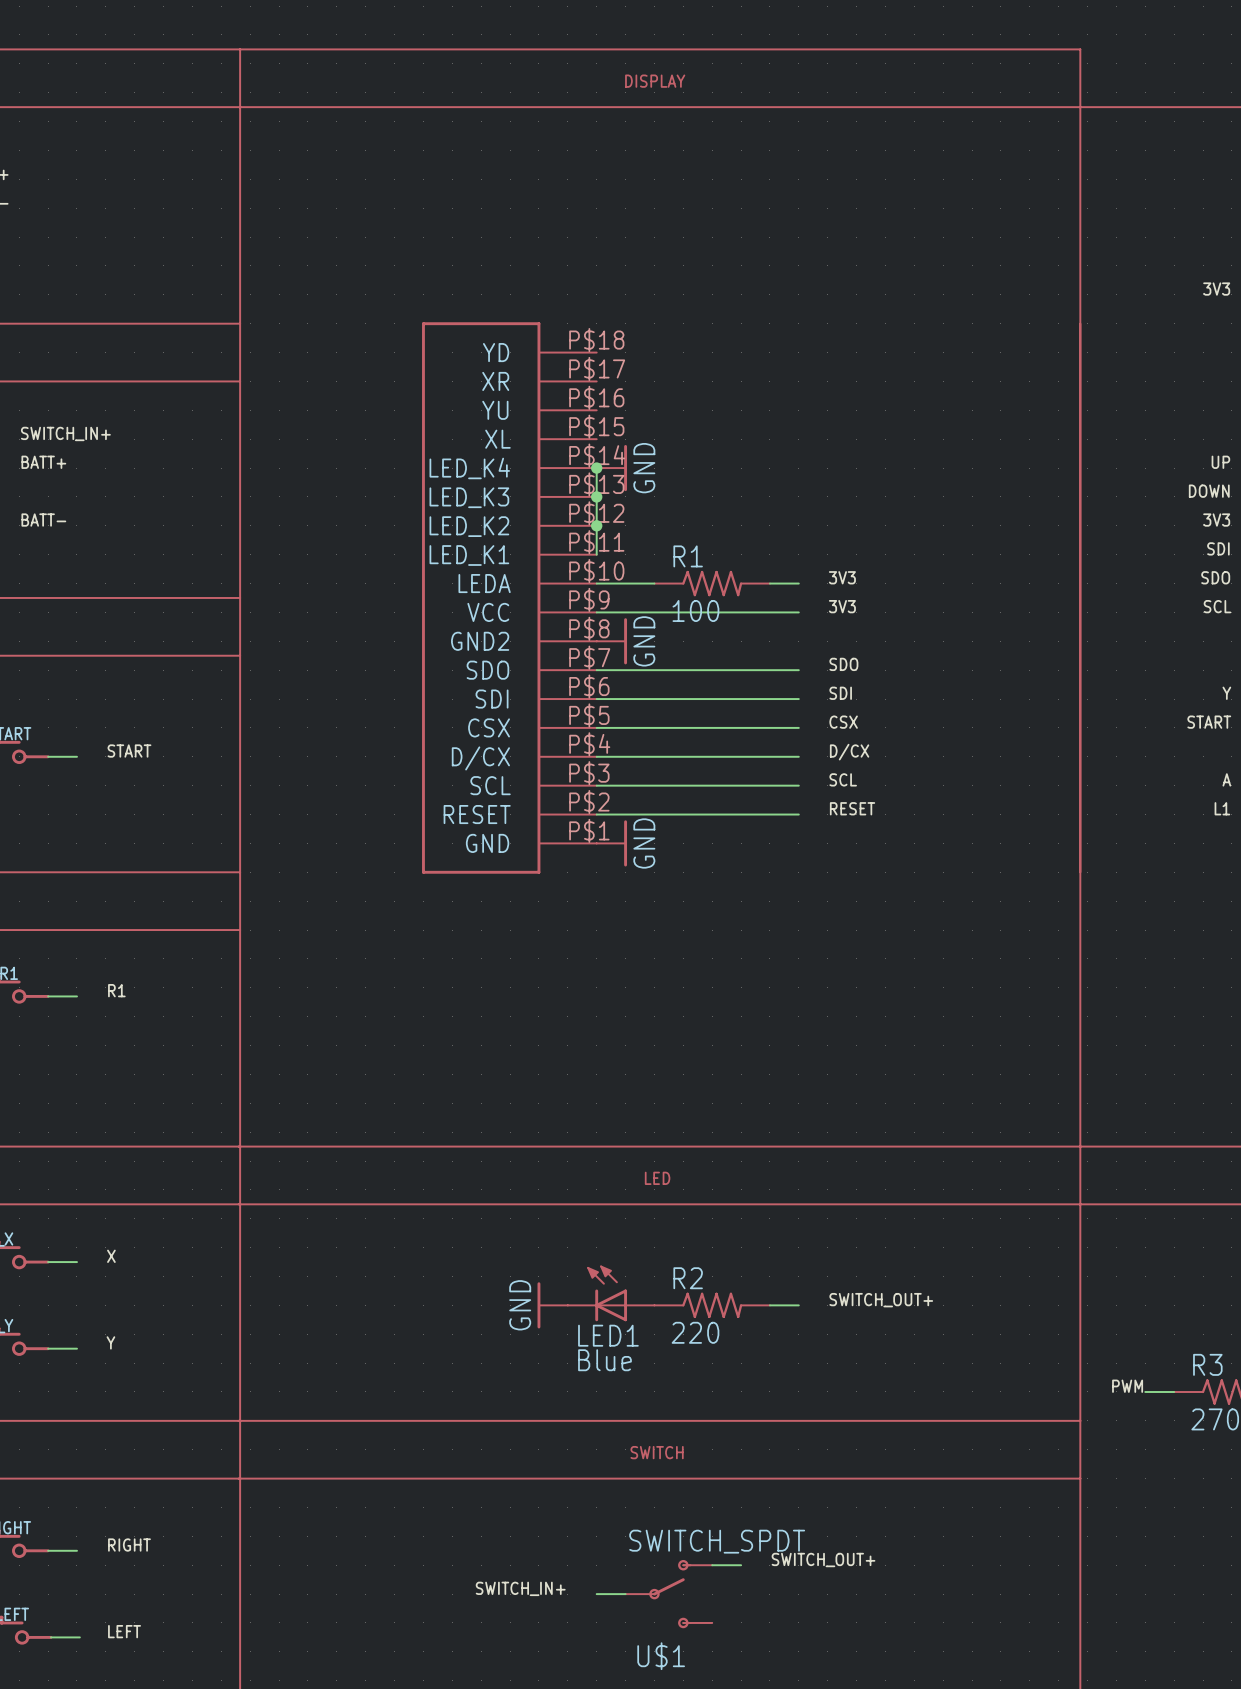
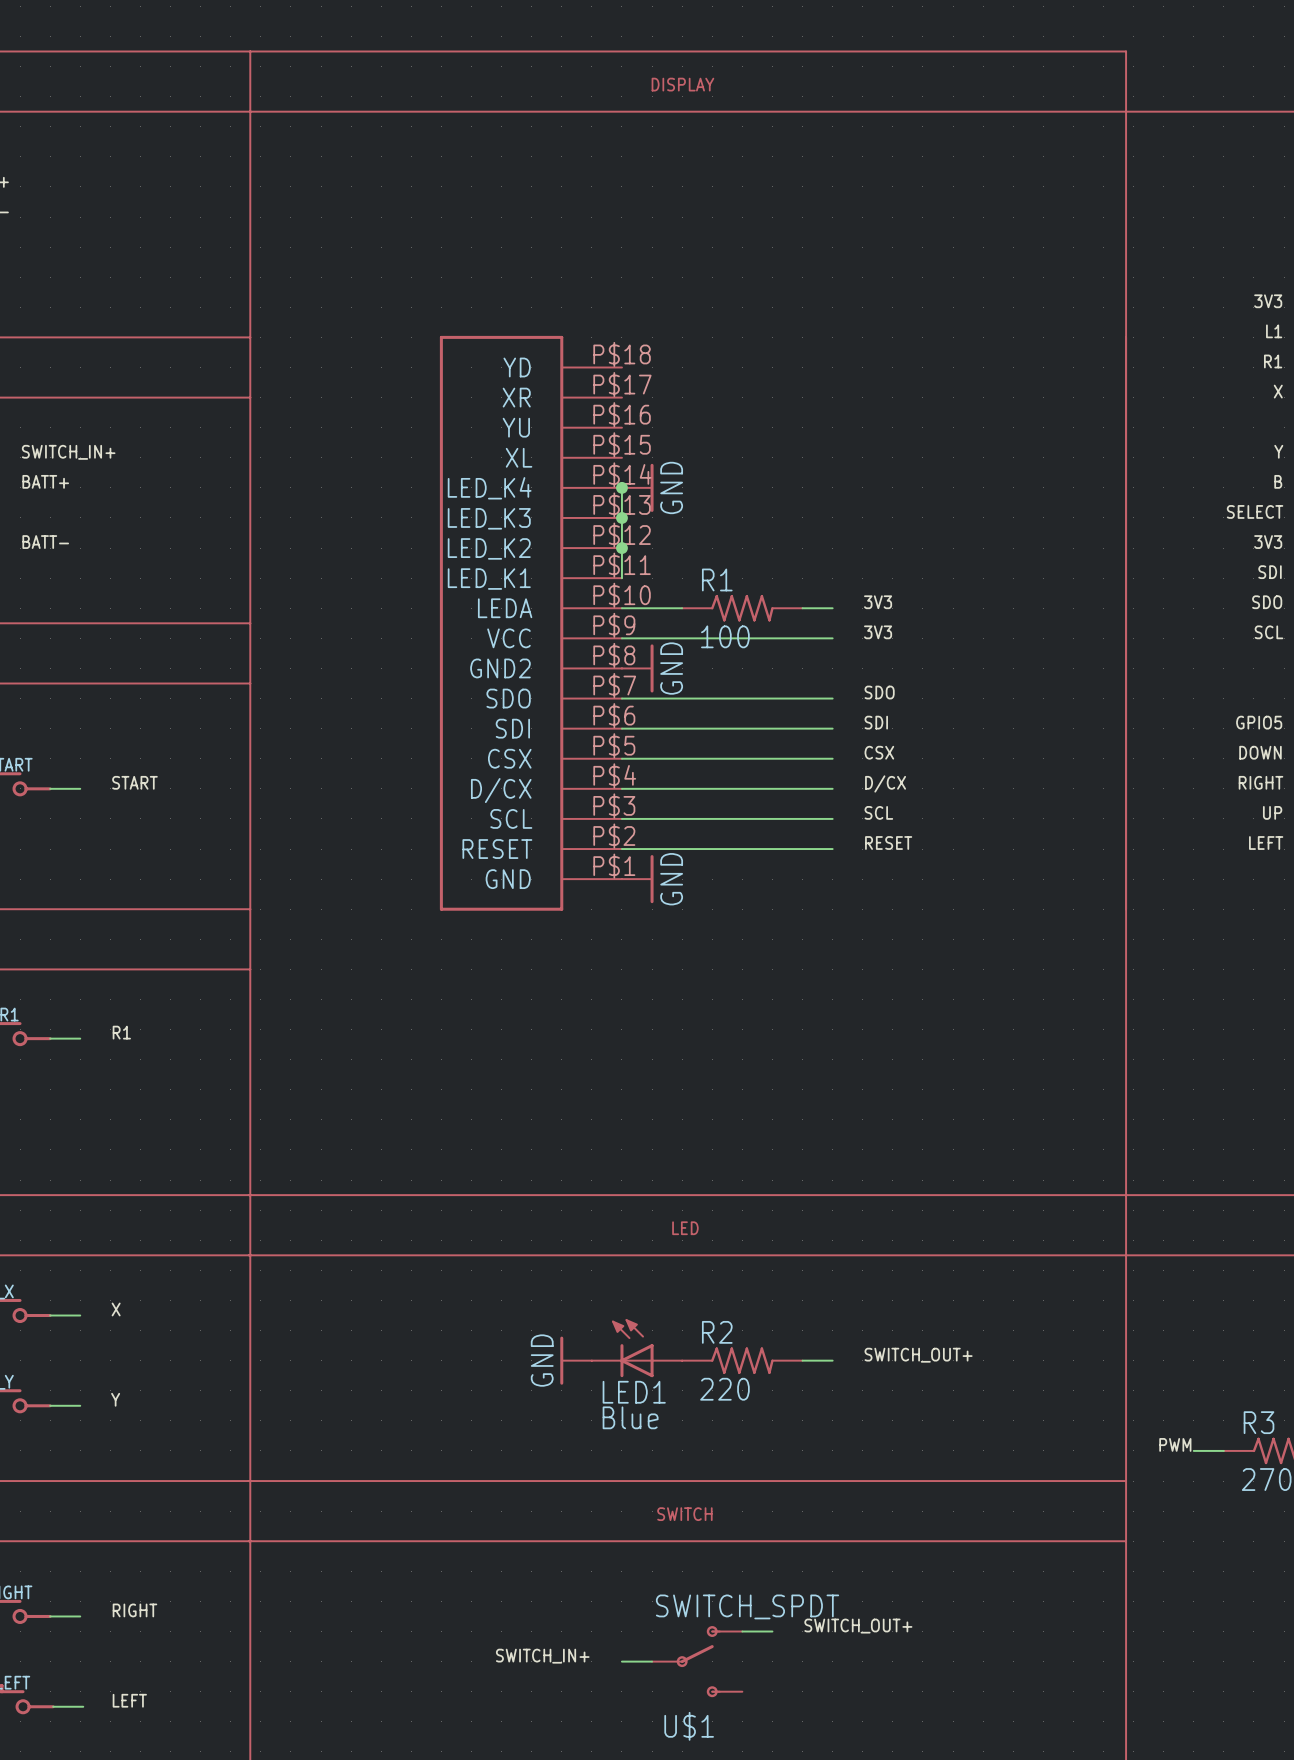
label: none -> L1 (1274, 331)
label: none -> R1 (1273, 361)
label: none -> X (1278, 391)
label: none -> Y (1278, 451)
label: UP (1220, 462) -> B (1278, 481)
label: DOWN (1209, 491) -> SELECT (1255, 511)
label: Y (1226, 693) -> GPIO5 (1259, 722)
label: START (1209, 722) -> DOWN (1260, 752)
label: none -> RIGHT (1260, 782)
label: A (1226, 779) -> UP (1272, 812)
label: L1 (1222, 808) -> LEFT (1266, 843)

